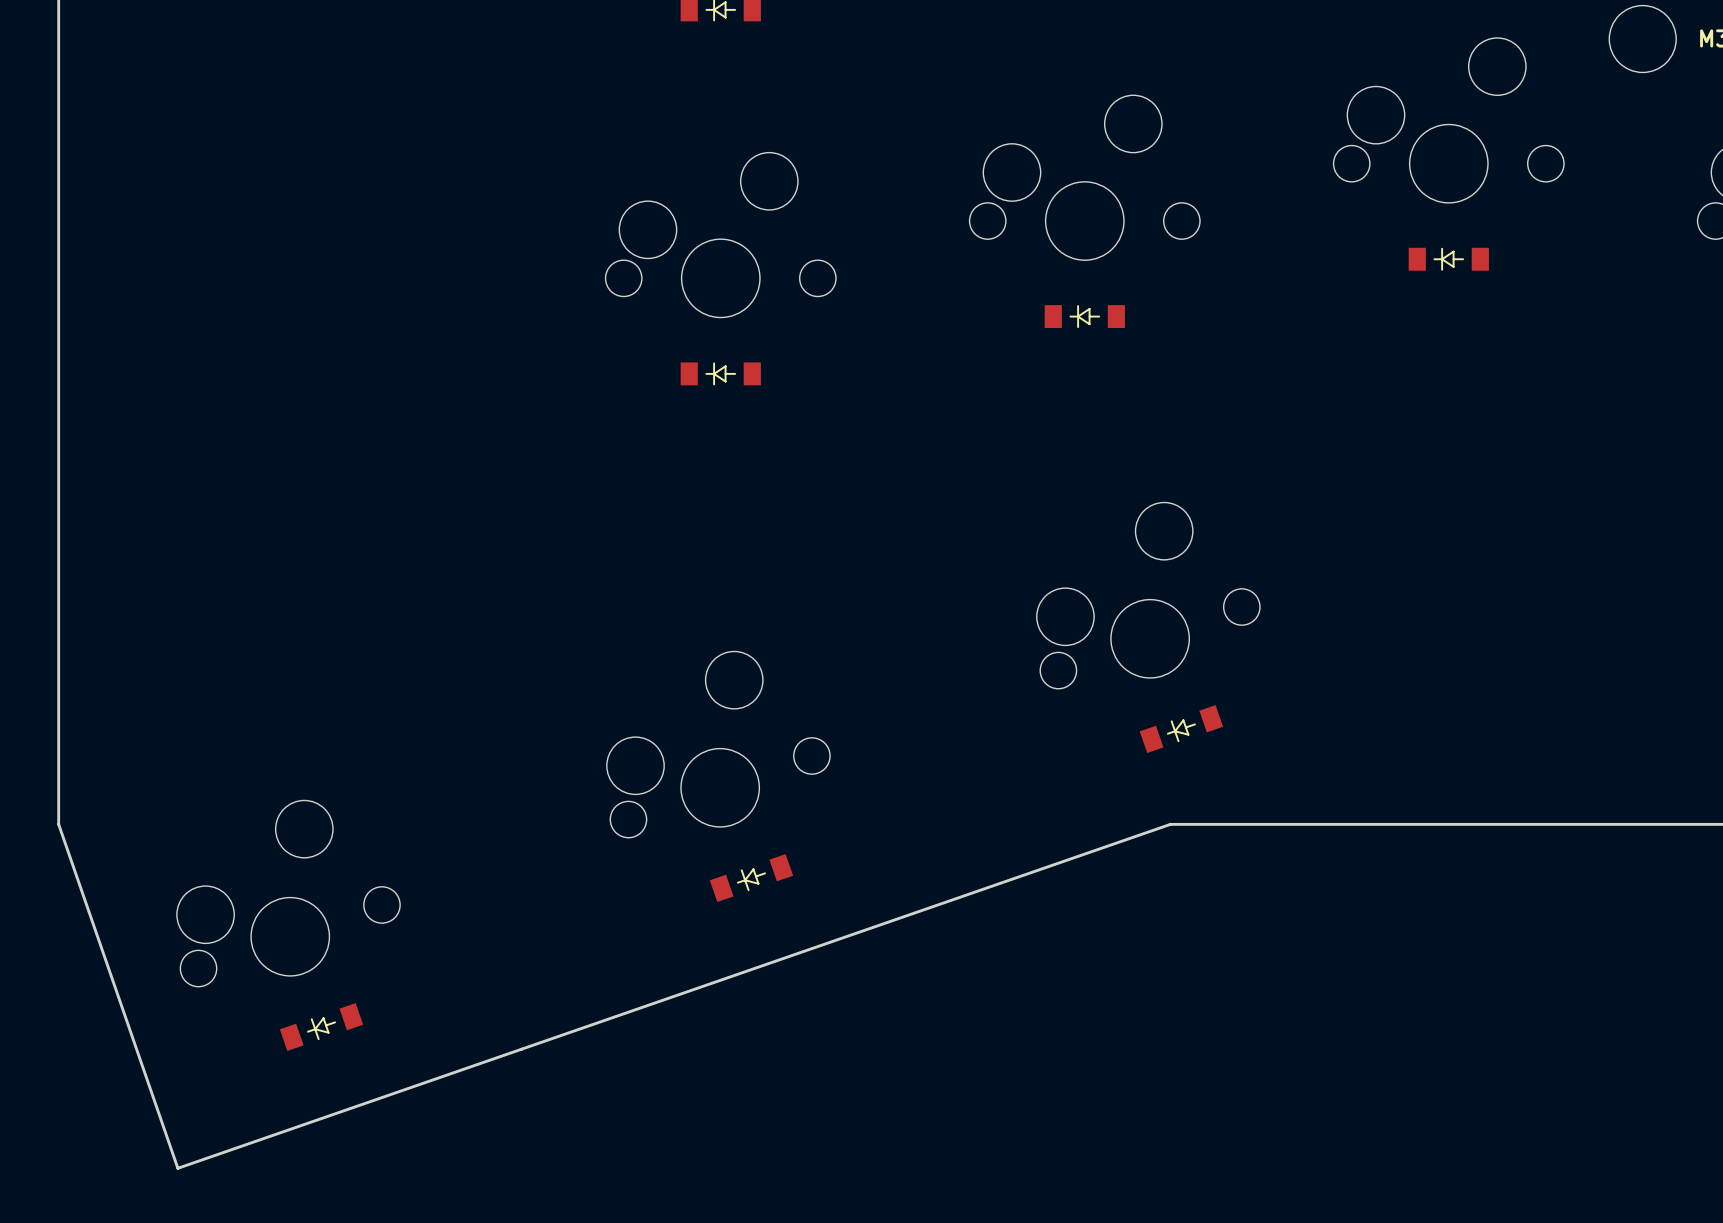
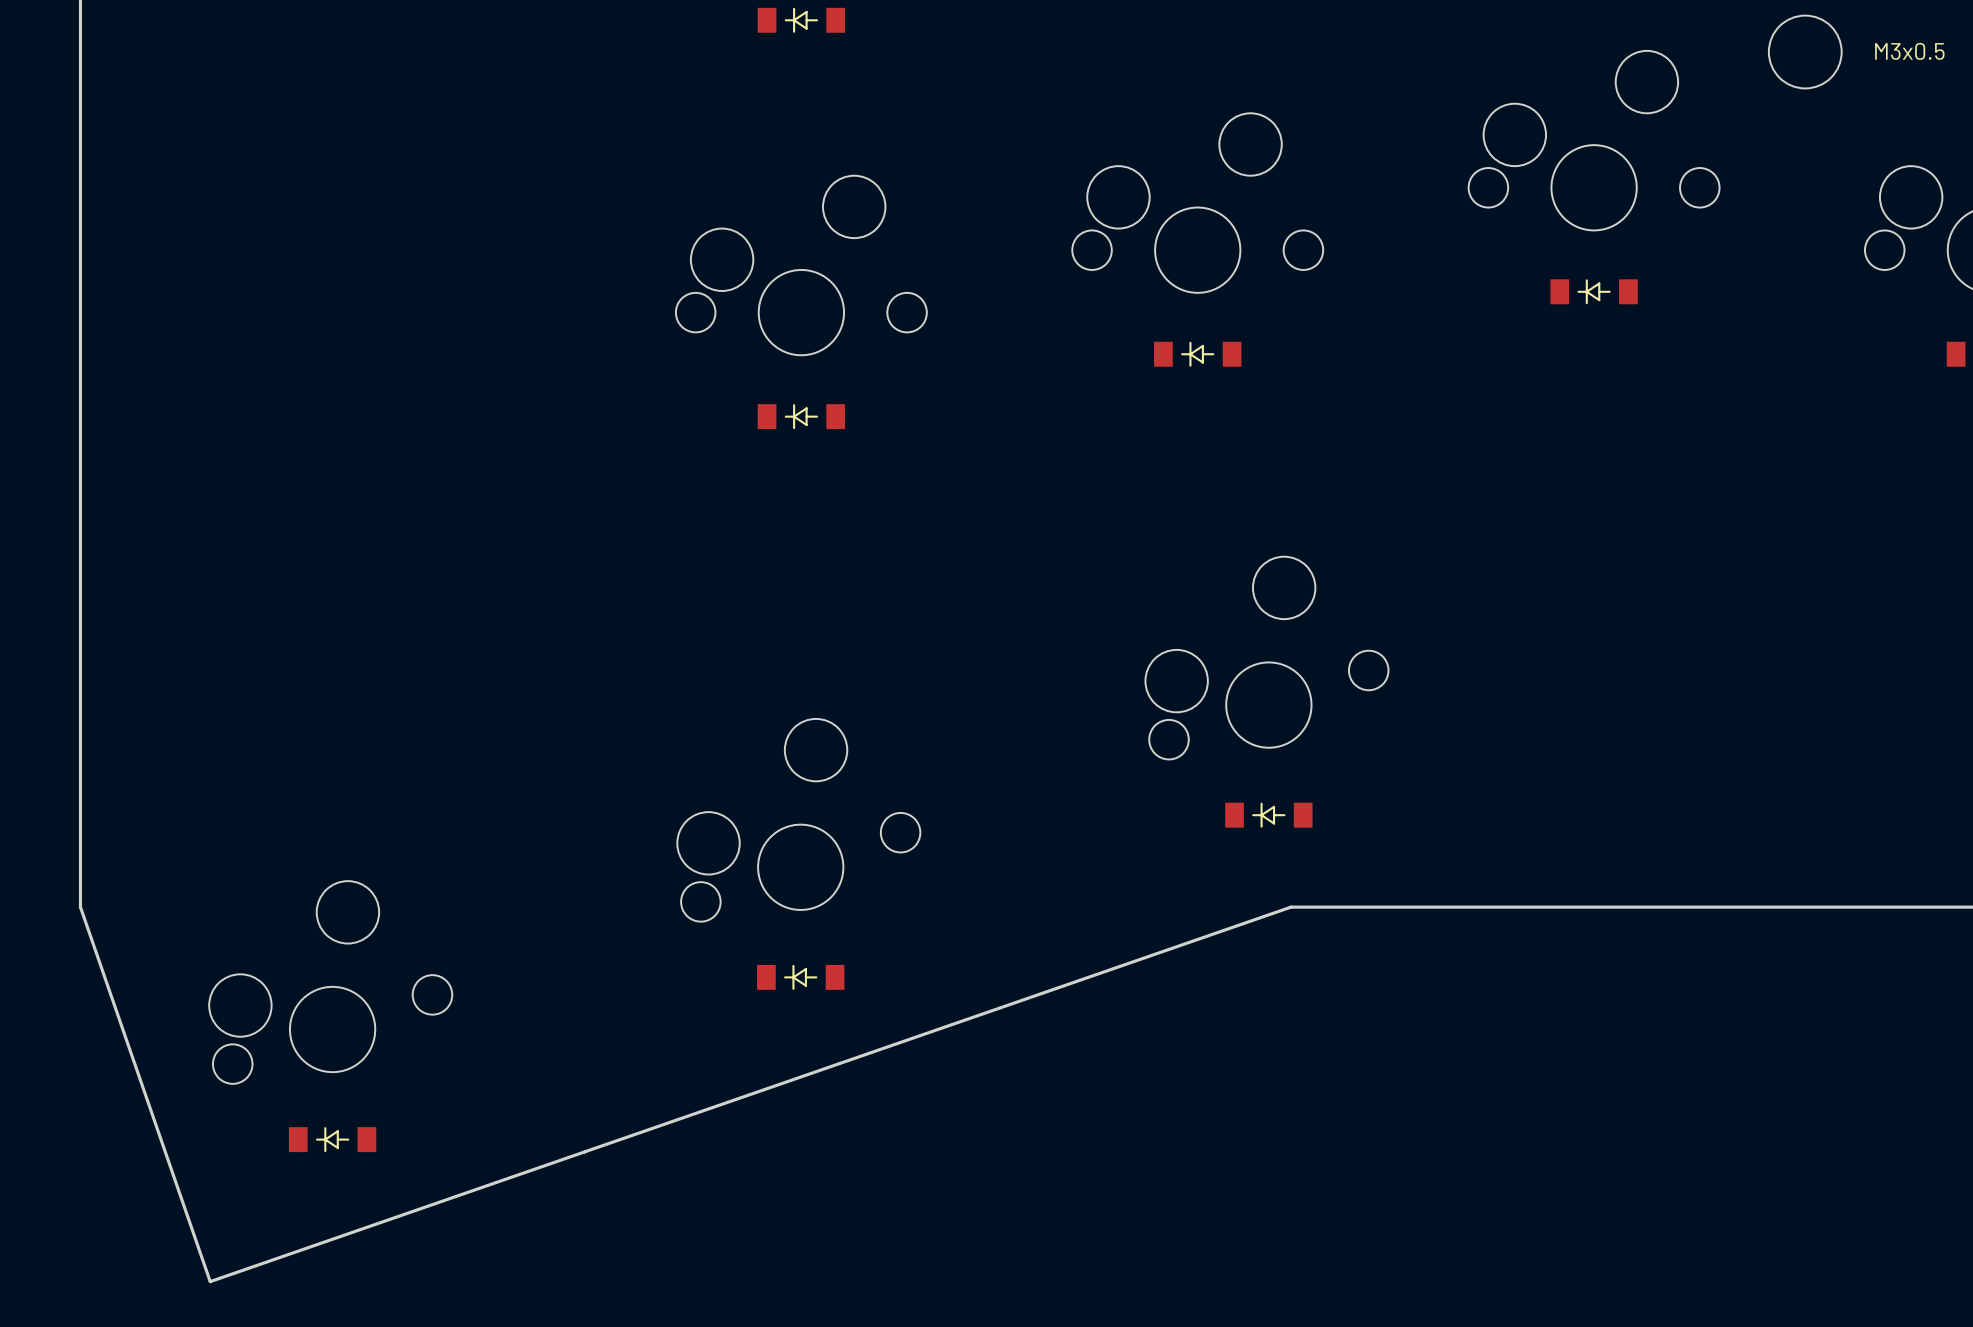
part: (1181, 729) -> none
part: none -> (1268, 815)
part: (751, 878) -> none
part: none -> (800, 977)
part: (321, 1027) -> none
part: none -> (332, 1139)

